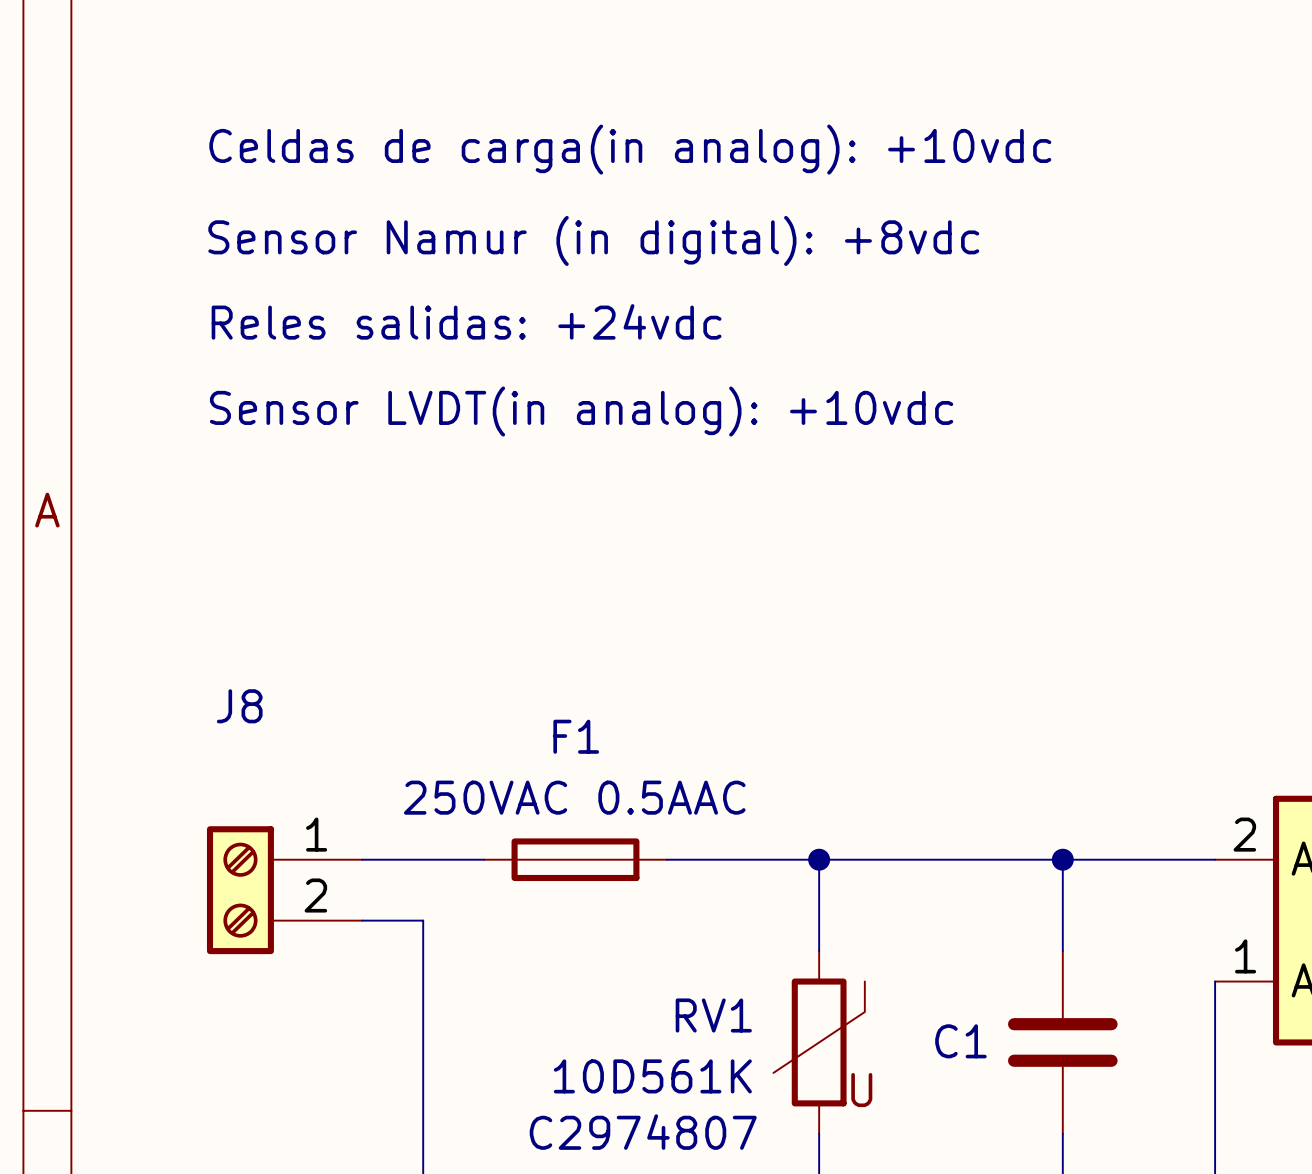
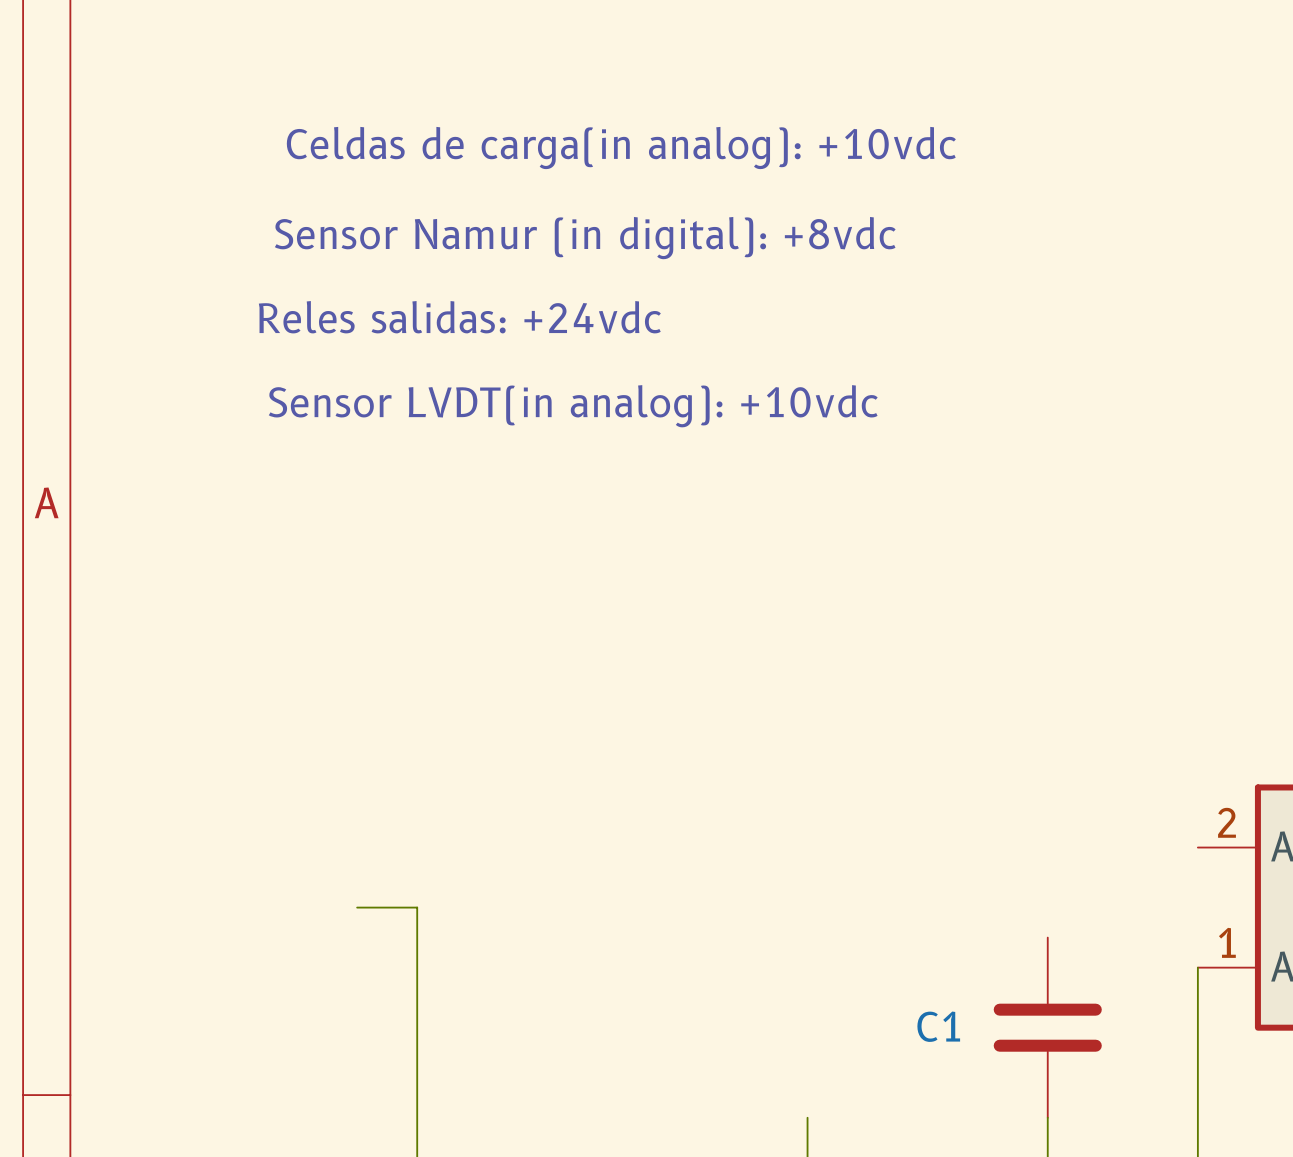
wire: (362, 859) (484, 859) -> none
F1: 250VAC 0.5AAC (575, 859) -> none
wire: (666, 859) (1215, 859) -> none
wire: (819, 859) (819, 951) -> none
junction: (819, 859) -> none
wire: (1062, 859) (1062, 951) -> none
junction: (1062, 859) -> none
J8: (284, 890) -> none
RV1: 10D561K (819, 1042) -> none
text: C2974807 (643, 1132) -> none

